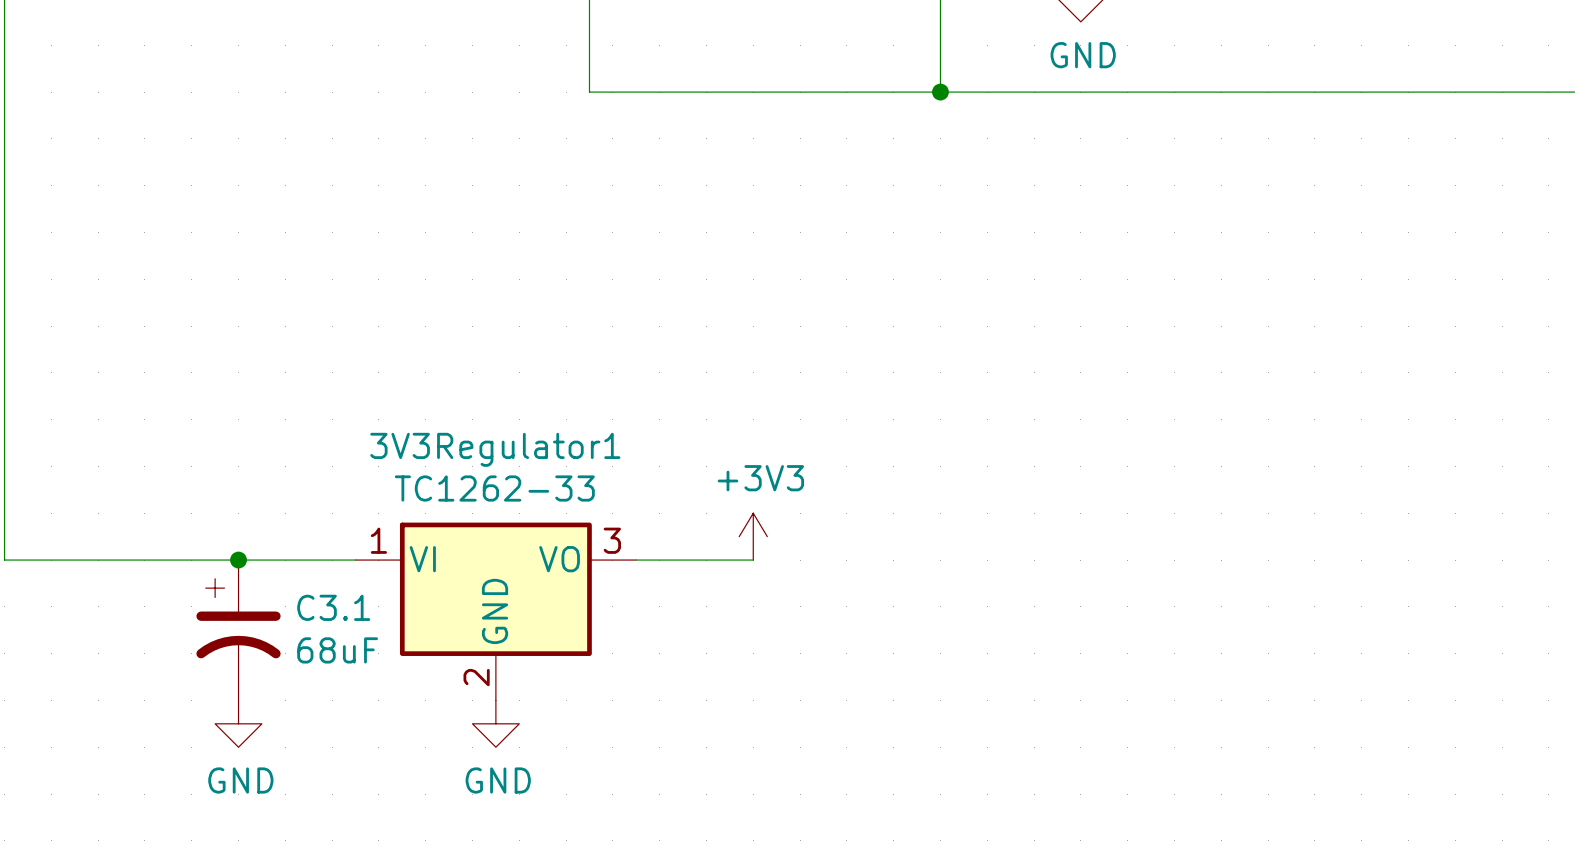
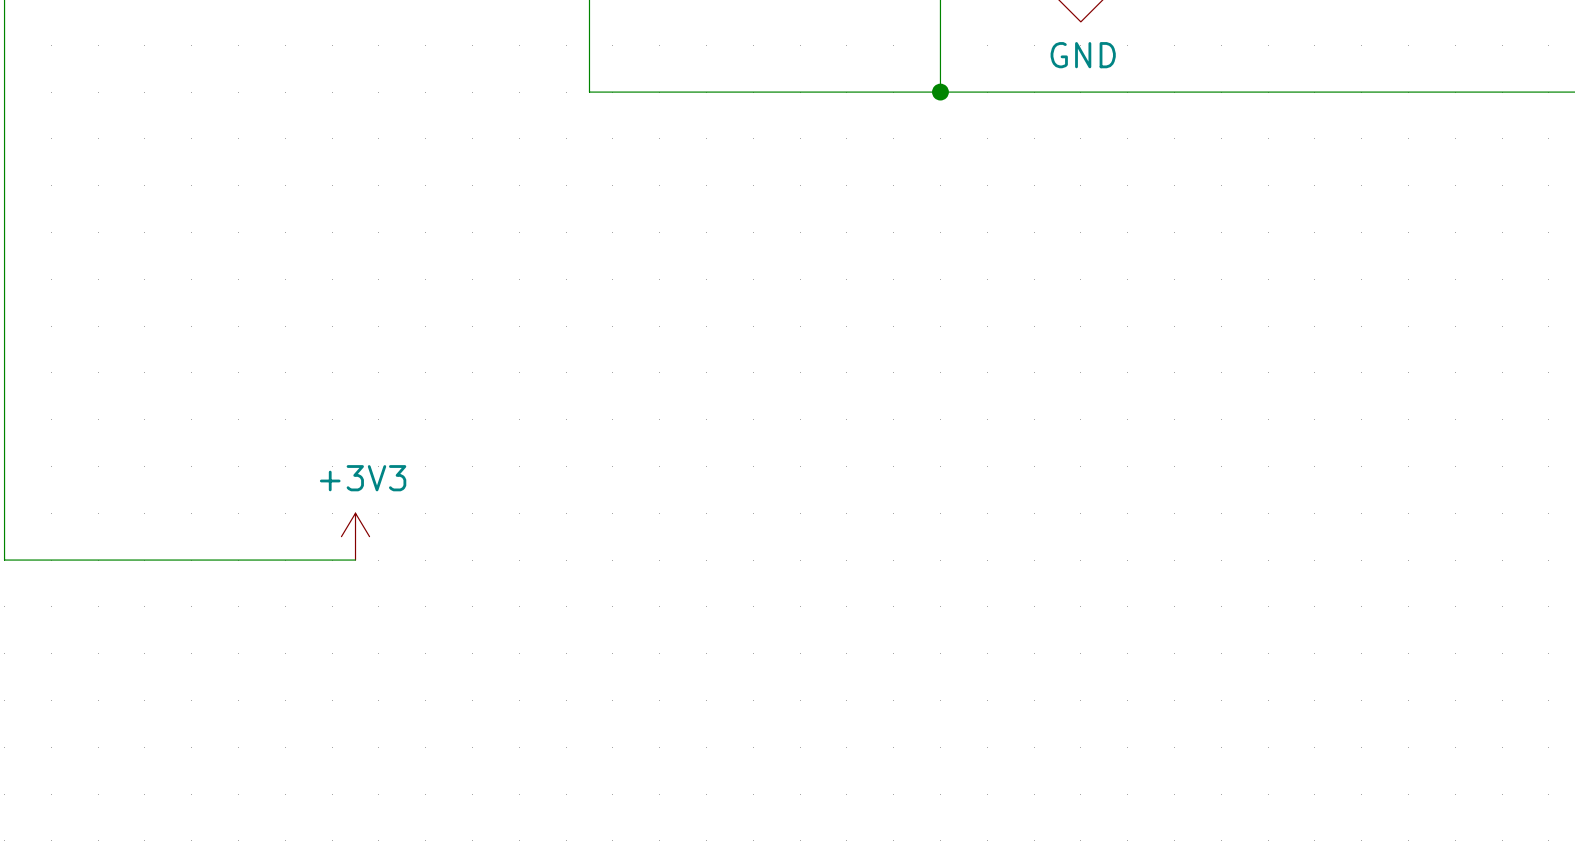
power symbol position: +3V3 (753, 536) -> +3V3 (355, 536)
junction: (238, 560) -> none
wire: (636, 560) (753, 560) -> none
3V3Regulator1: TC1262-33 (495, 611) -> none
C3.1: 68uF (238, 630) -> none
power symbol: GND (238, 723) -> none
power symbol: GND (495, 723) -> none

